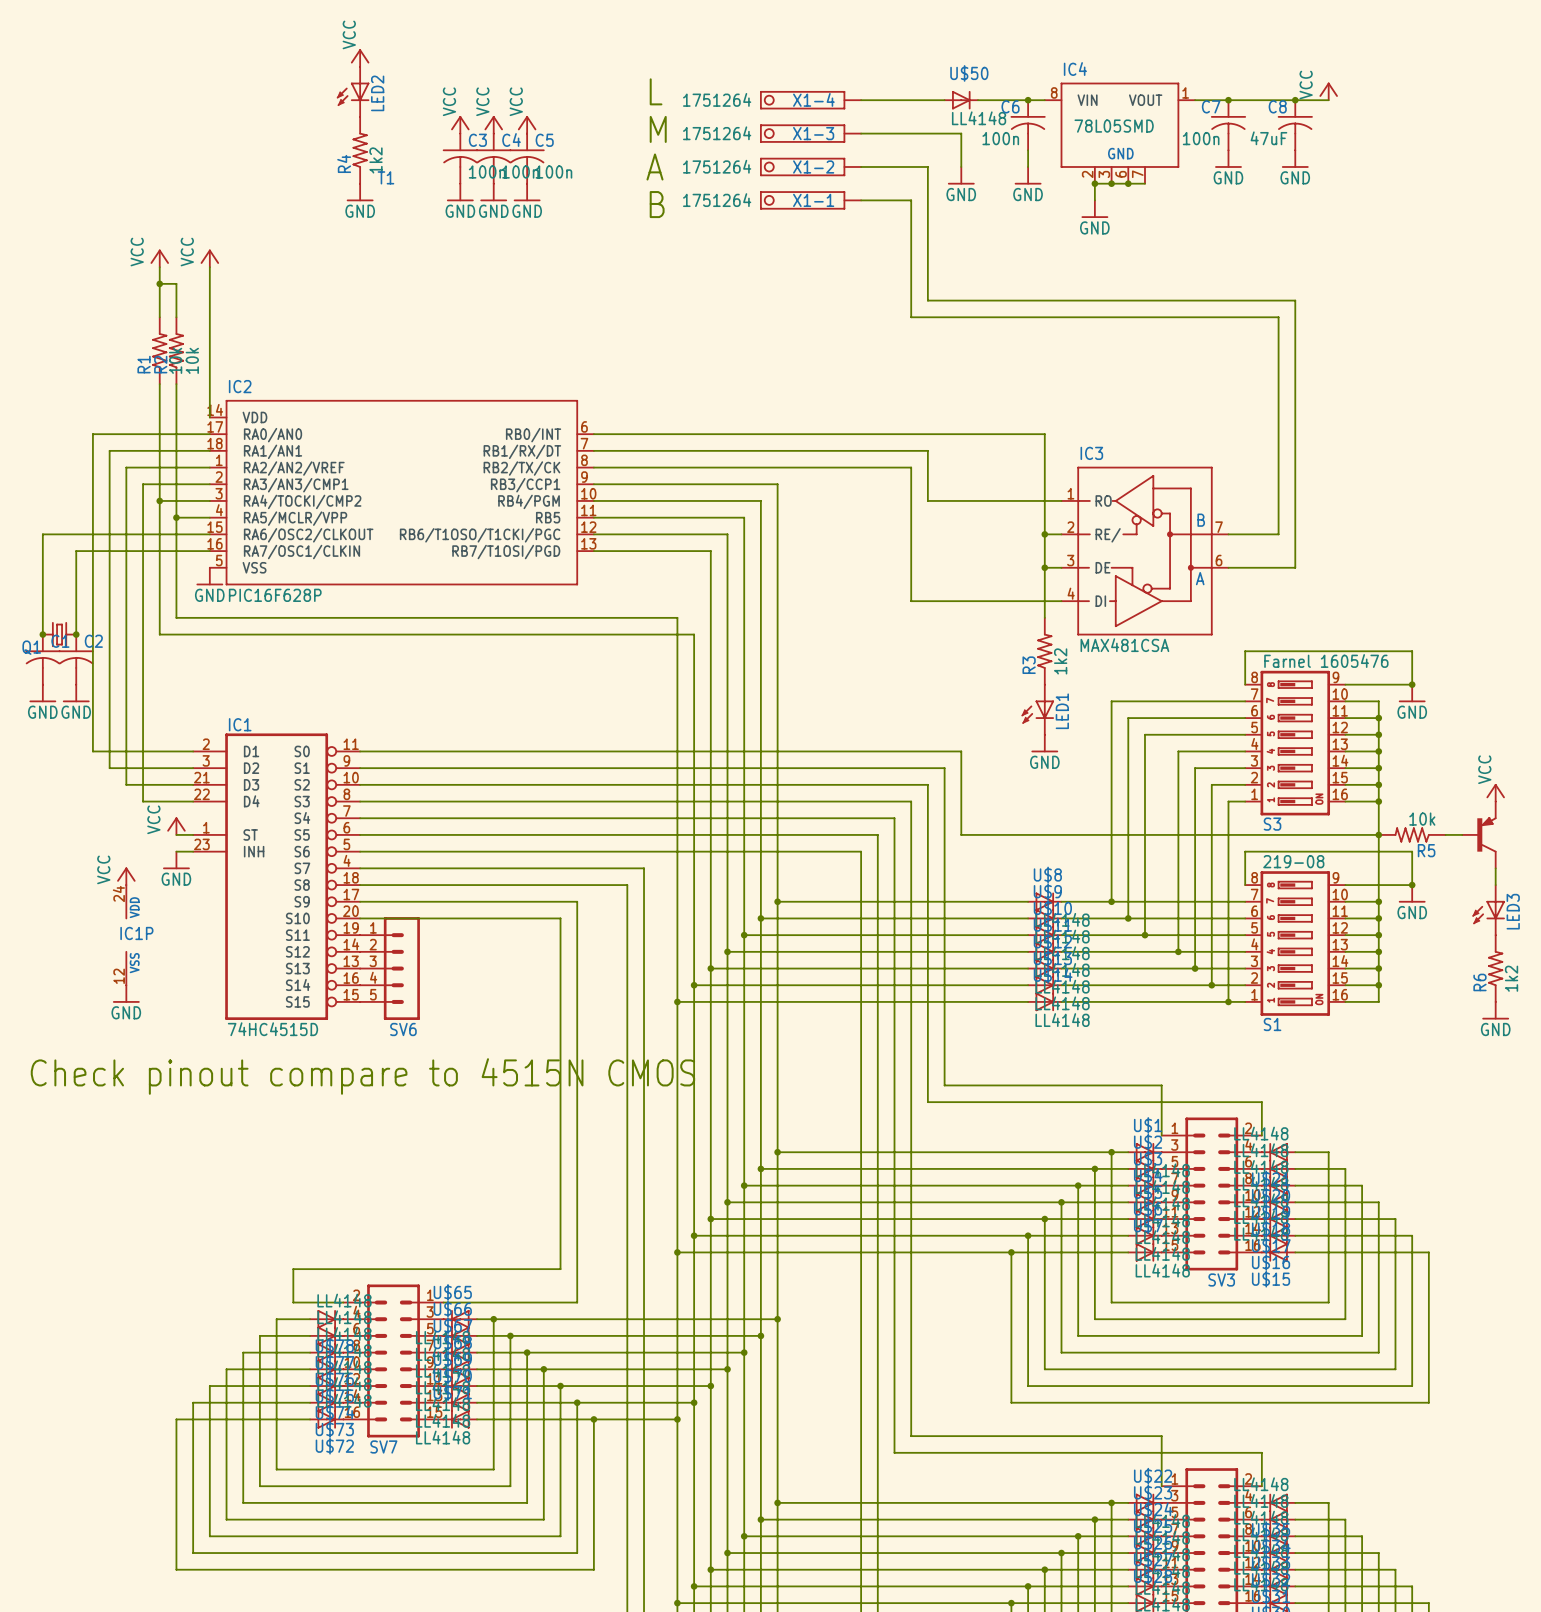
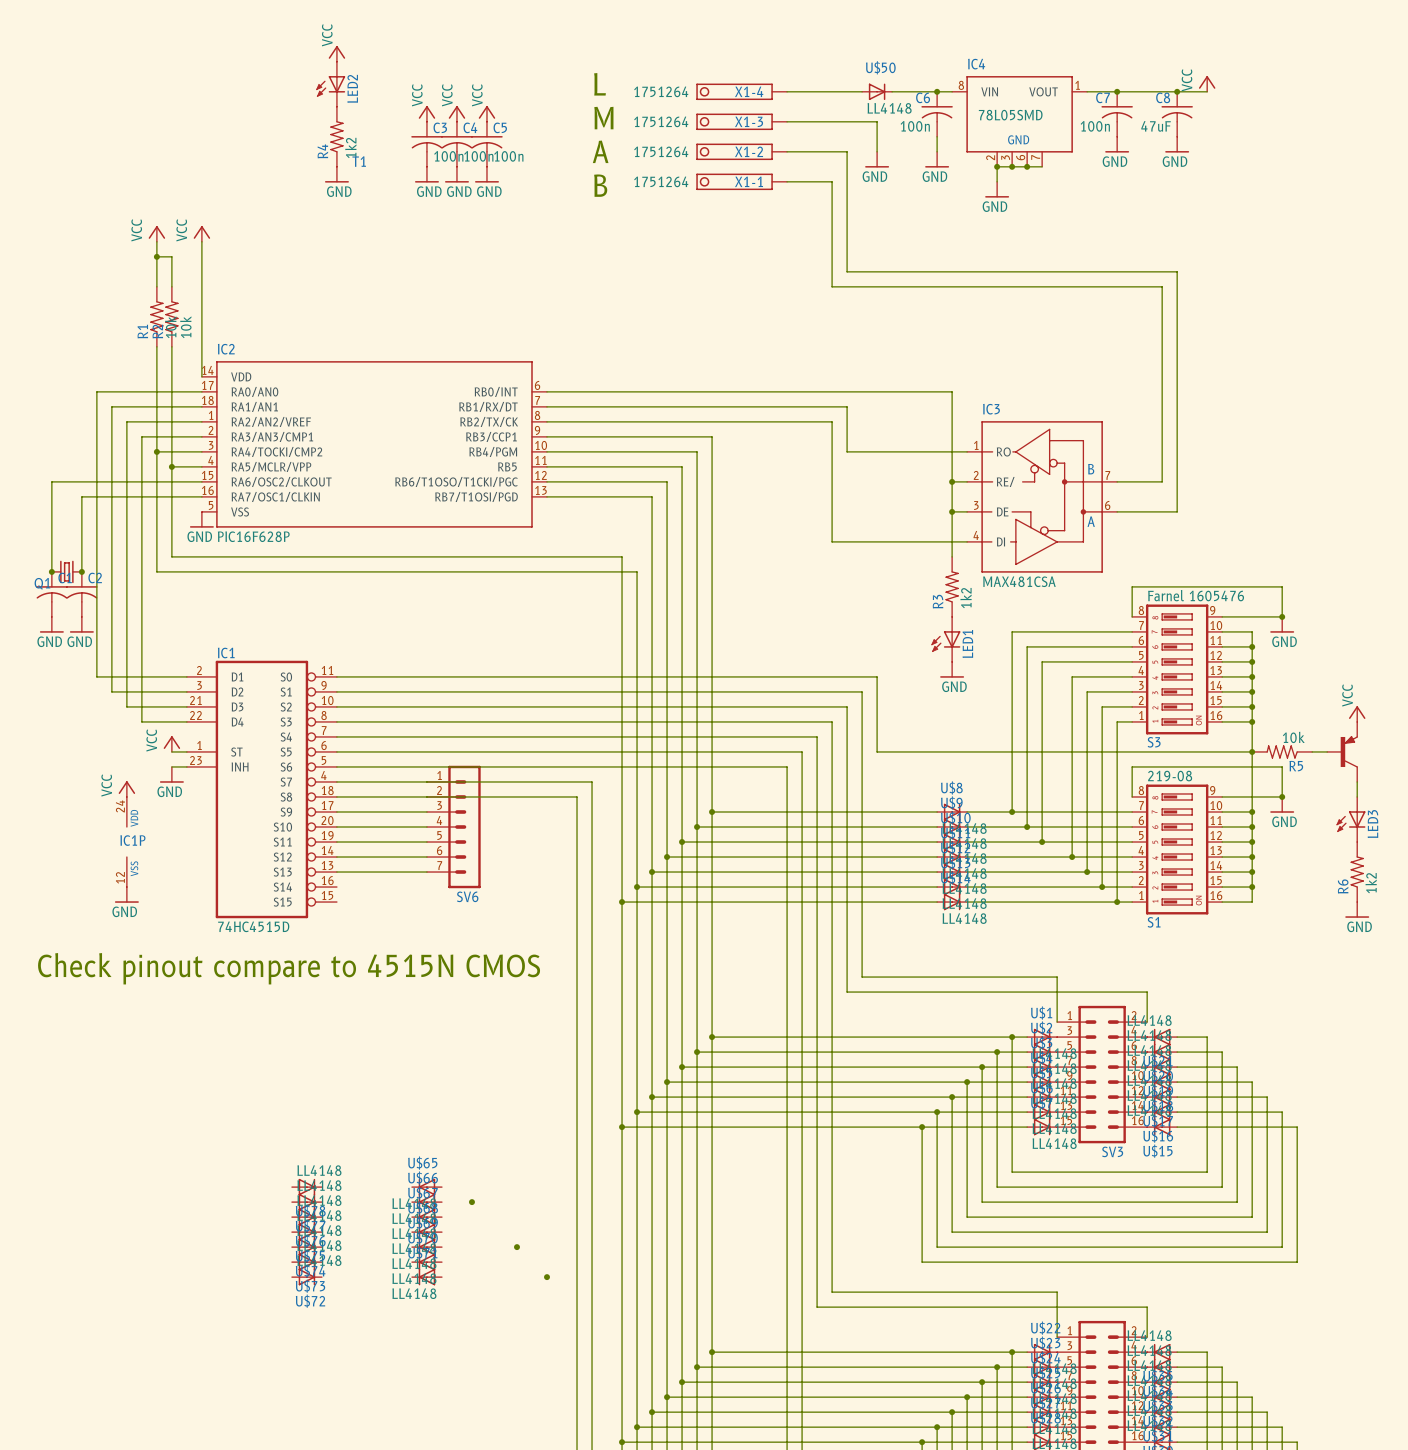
wire: (460, 901) (577, 901) (577, 1302) (443, 1302) -> none
SV6 symbol: [360, 917, 420, 1020] -> [426, 765, 481, 889]
wire: (460, 918) (560, 918) (560, 1269) (293, 1269) (293, 1302) (343, 1302) -> none
wire: none -> (336, 842) (426, 842)
wire: none -> (336, 857) (426, 857)
wire: none -> (336, 872) (426, 872)
SV6 name position: SV6 (403, 1029) -> SV6 (467, 896)
wire: (310, 1319) (276, 1319) (276, 1469) (493, 1469) (493, 1319) -> none
wire: (477, 1319) (777, 1319) -> none
junction: (493, 1319) -> none
junction: (777, 1319) -> none
wire: (310, 1335) (259, 1335) (259, 1486) (510, 1486) (510, 1335) -> none
wire: (477, 1335) (760, 1335) -> none
junction: (760, 1335) -> none
wire: (310, 1352) (243, 1352) (243, 1502) (527, 1502) (527, 1352) -> none
wire: (477, 1352) (744, 1352) -> none
junction: (527, 1352) -> none
junction: (744, 1352) -> none
SV7: (393, 1360) -> none
wire: (310, 1369) (226, 1369) (226, 1519) (543, 1519) (543, 1369) -> none
wire: (477, 1369) (727, 1369) -> none
junction: (543, 1369) -> none
junction: (727, 1369) -> none
wire: (310, 1386) (209, 1386) (209, 1536) (560, 1536) (560, 1386) -> none
wire: (477, 1386) (710, 1386) -> none
junction: (710, 1386) -> none
wire: (310, 1402) (193, 1402) (193, 1553) (577, 1553) (577, 1402) -> none
wire: (477, 1402) (694, 1402) -> none
junction: (577, 1402) -> none
junction: (694, 1402) -> none
wire: (310, 1419) (176, 1419) (176, 1569) (593, 1569) (593, 1419) -> none
wire: (477, 1419) (677, 1419) -> none
junction: (677, 1419) -> none

